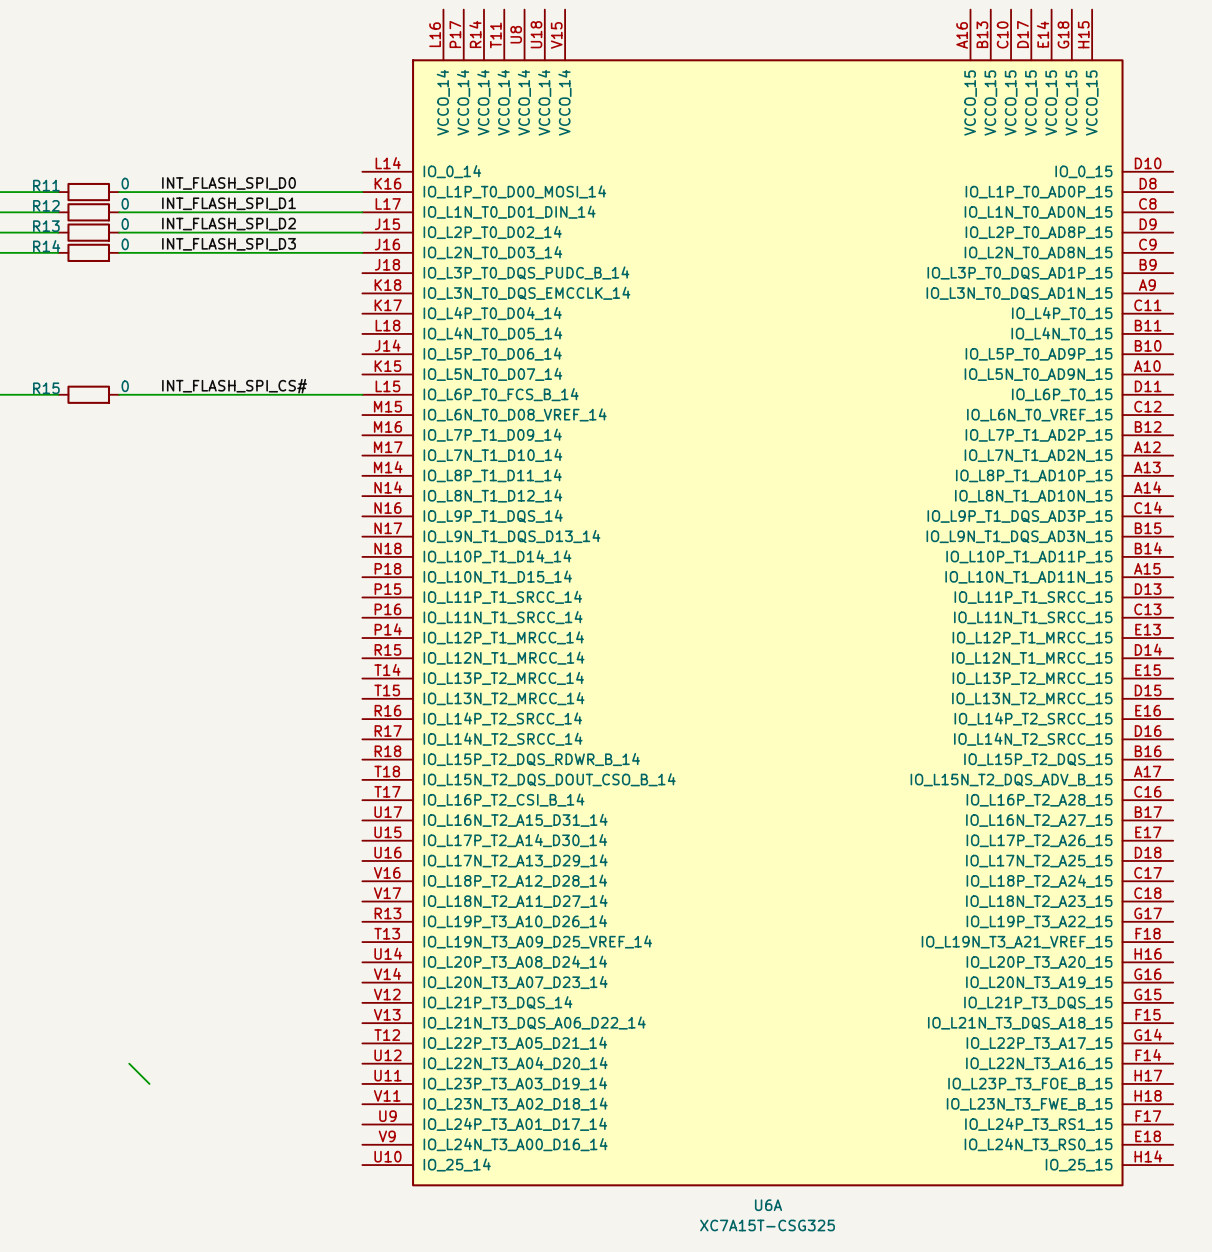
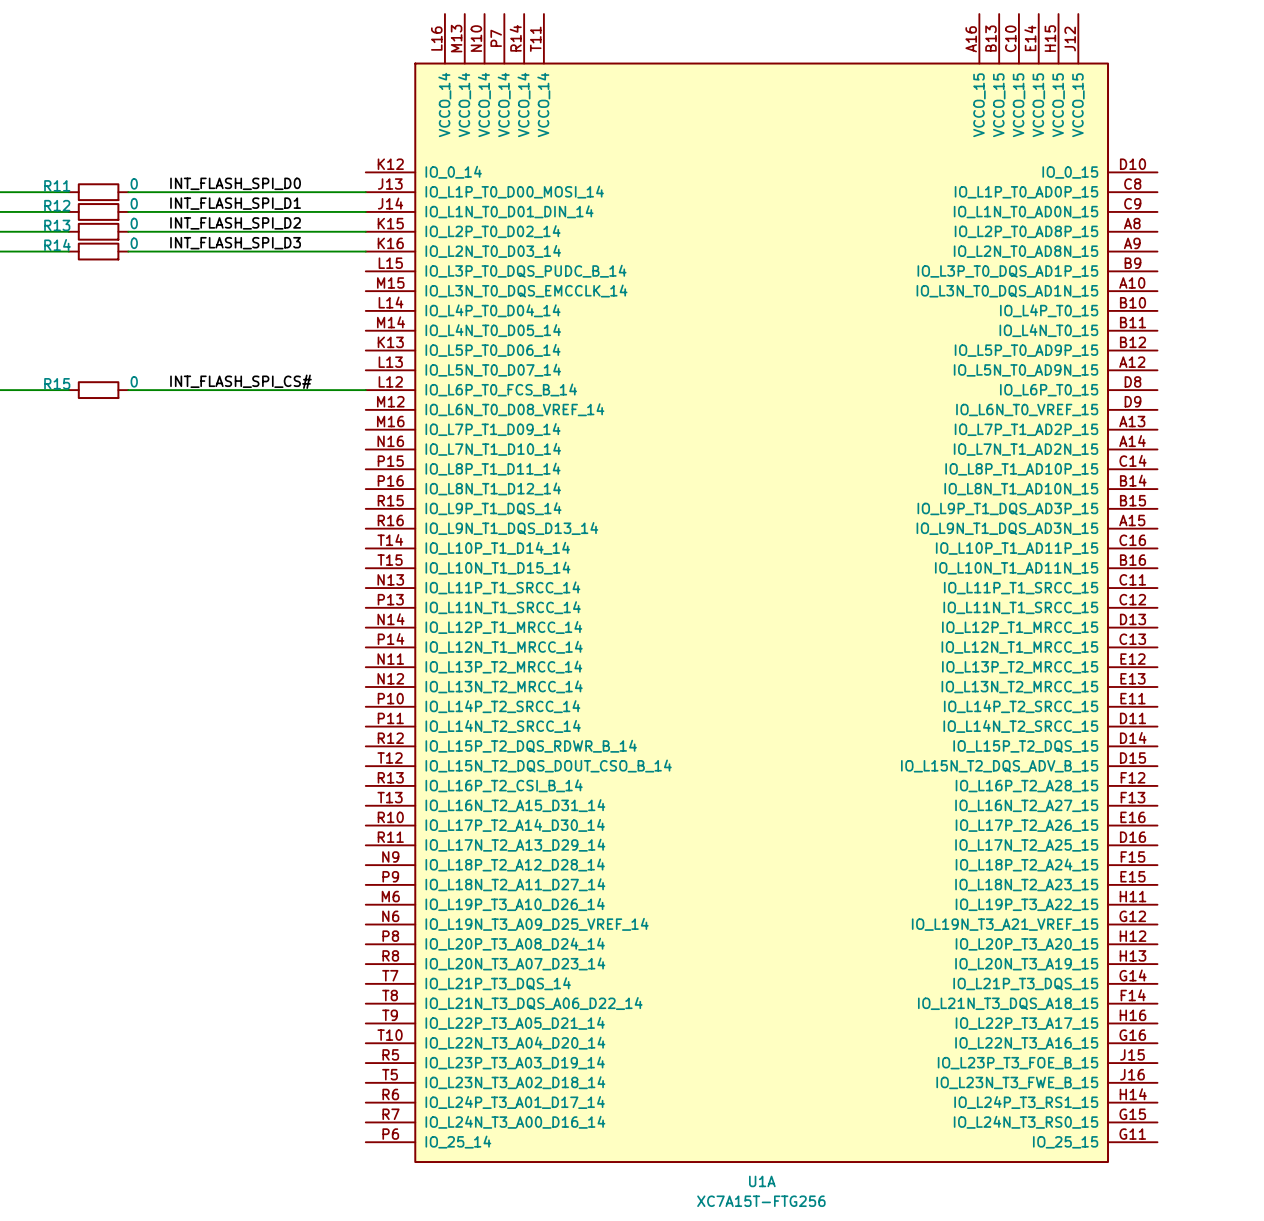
U6A: XC7A15T-CSG325 (767, 597) -> none
U1A: none -> XC7A15T-FTG256 (761, 588)
wire: (129, 1063) (149, 1083) -> none

